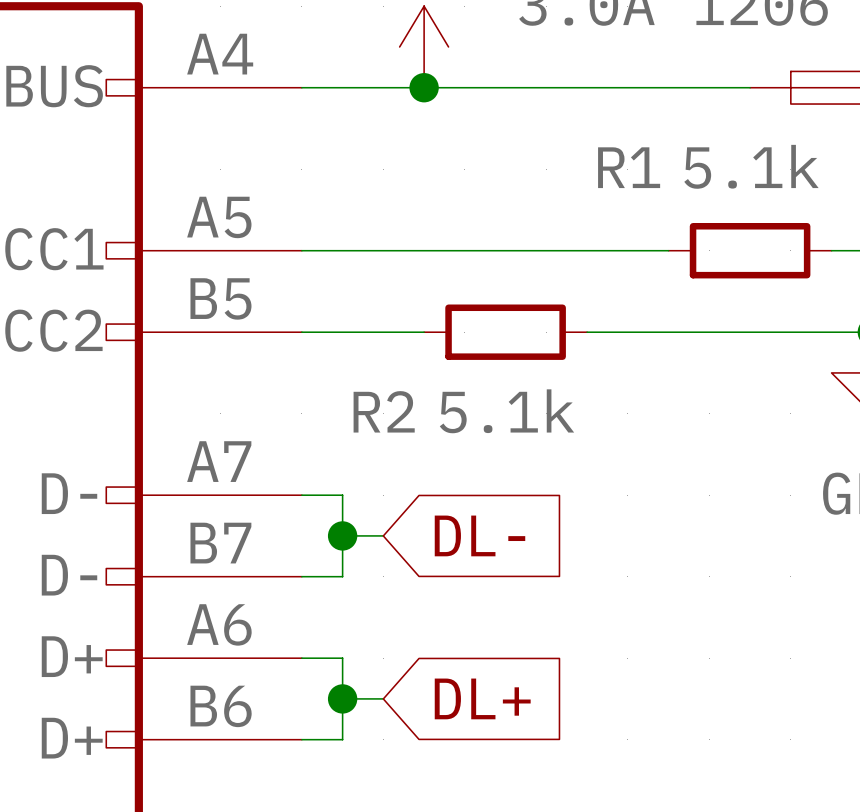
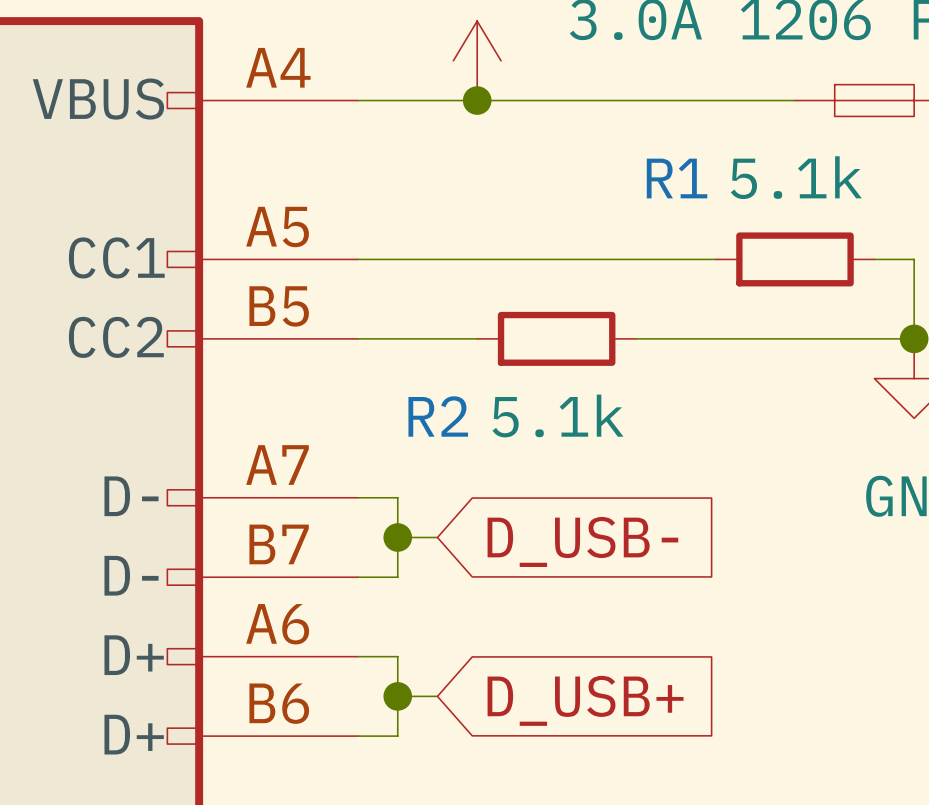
global label: DL- (479, 535) -> D_USB- (582, 541)
global label: DL+ (482, 698) -> D_USB+ (585, 700)

